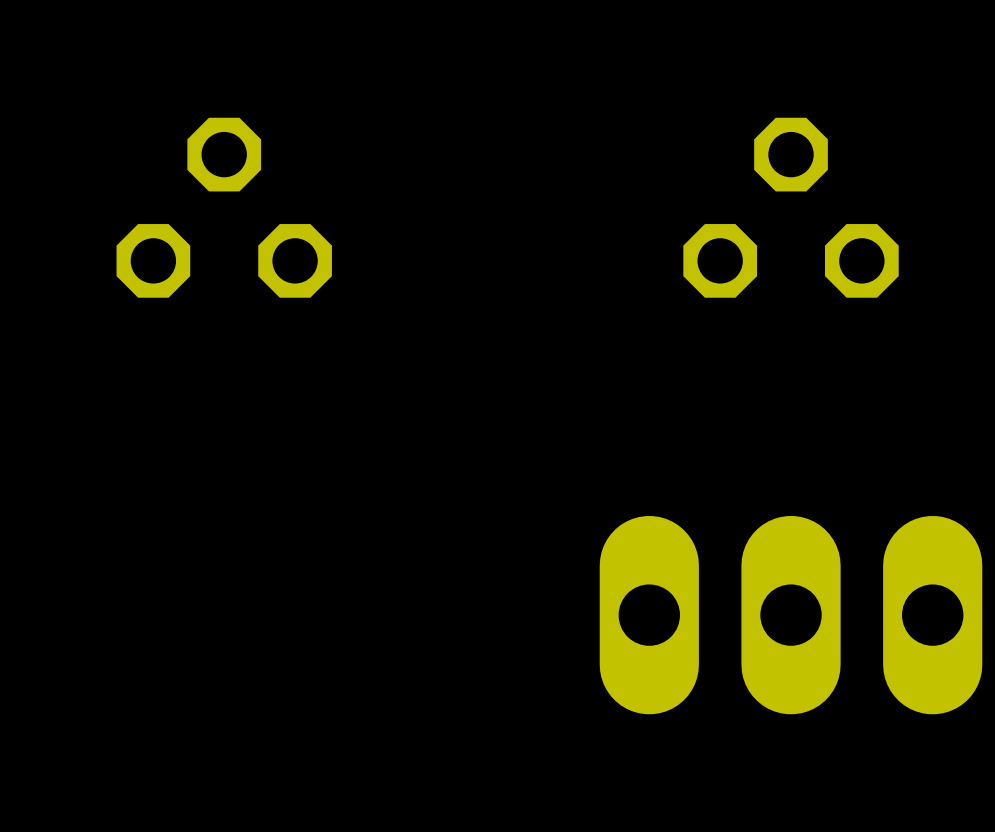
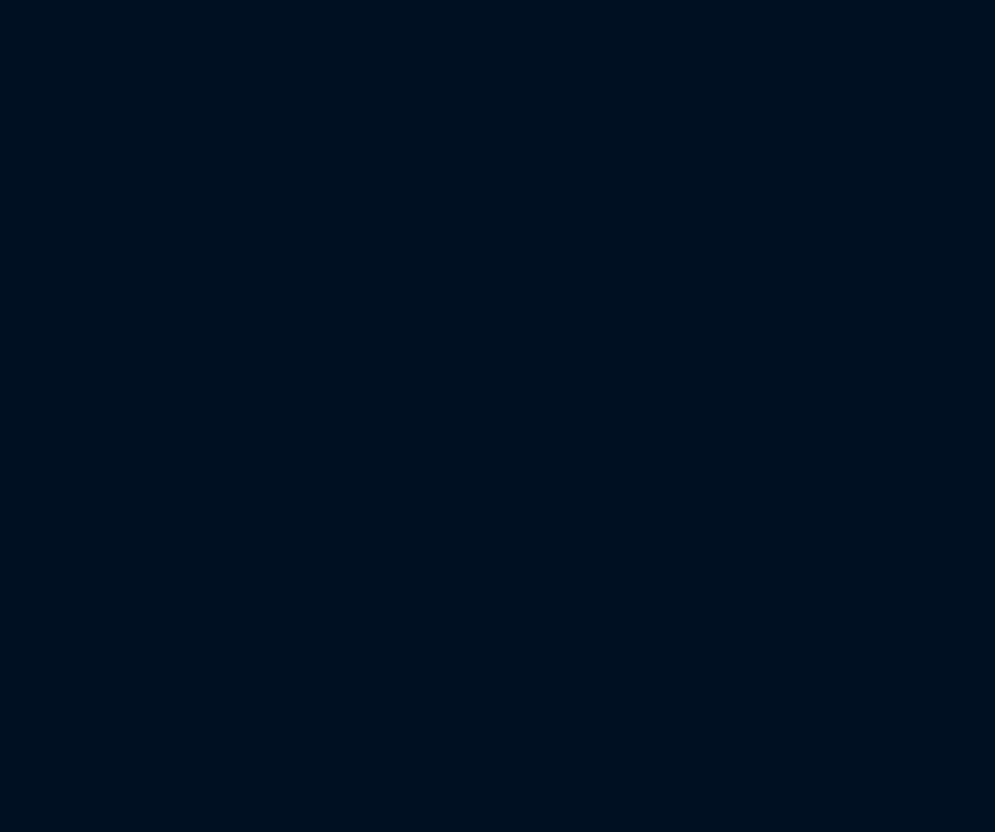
part: (224, 207) -> none
part: (791, 207) -> none
part: (791, 615) -> none

